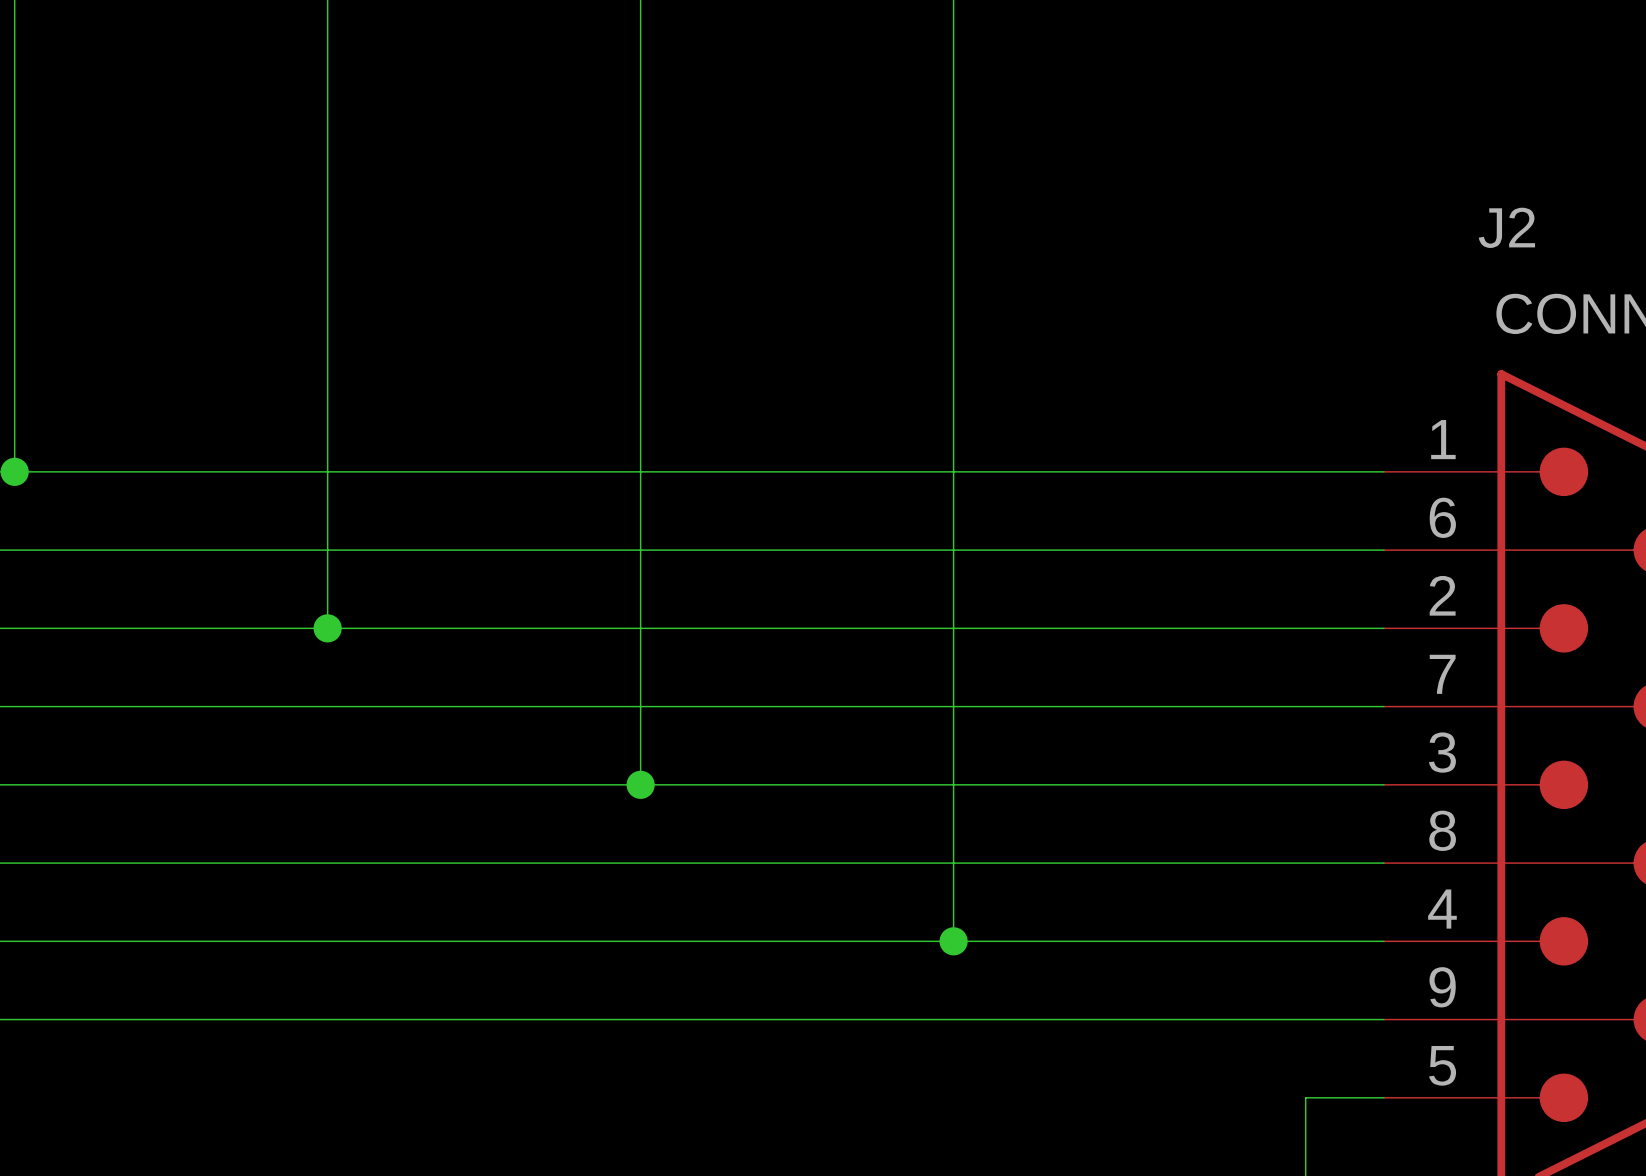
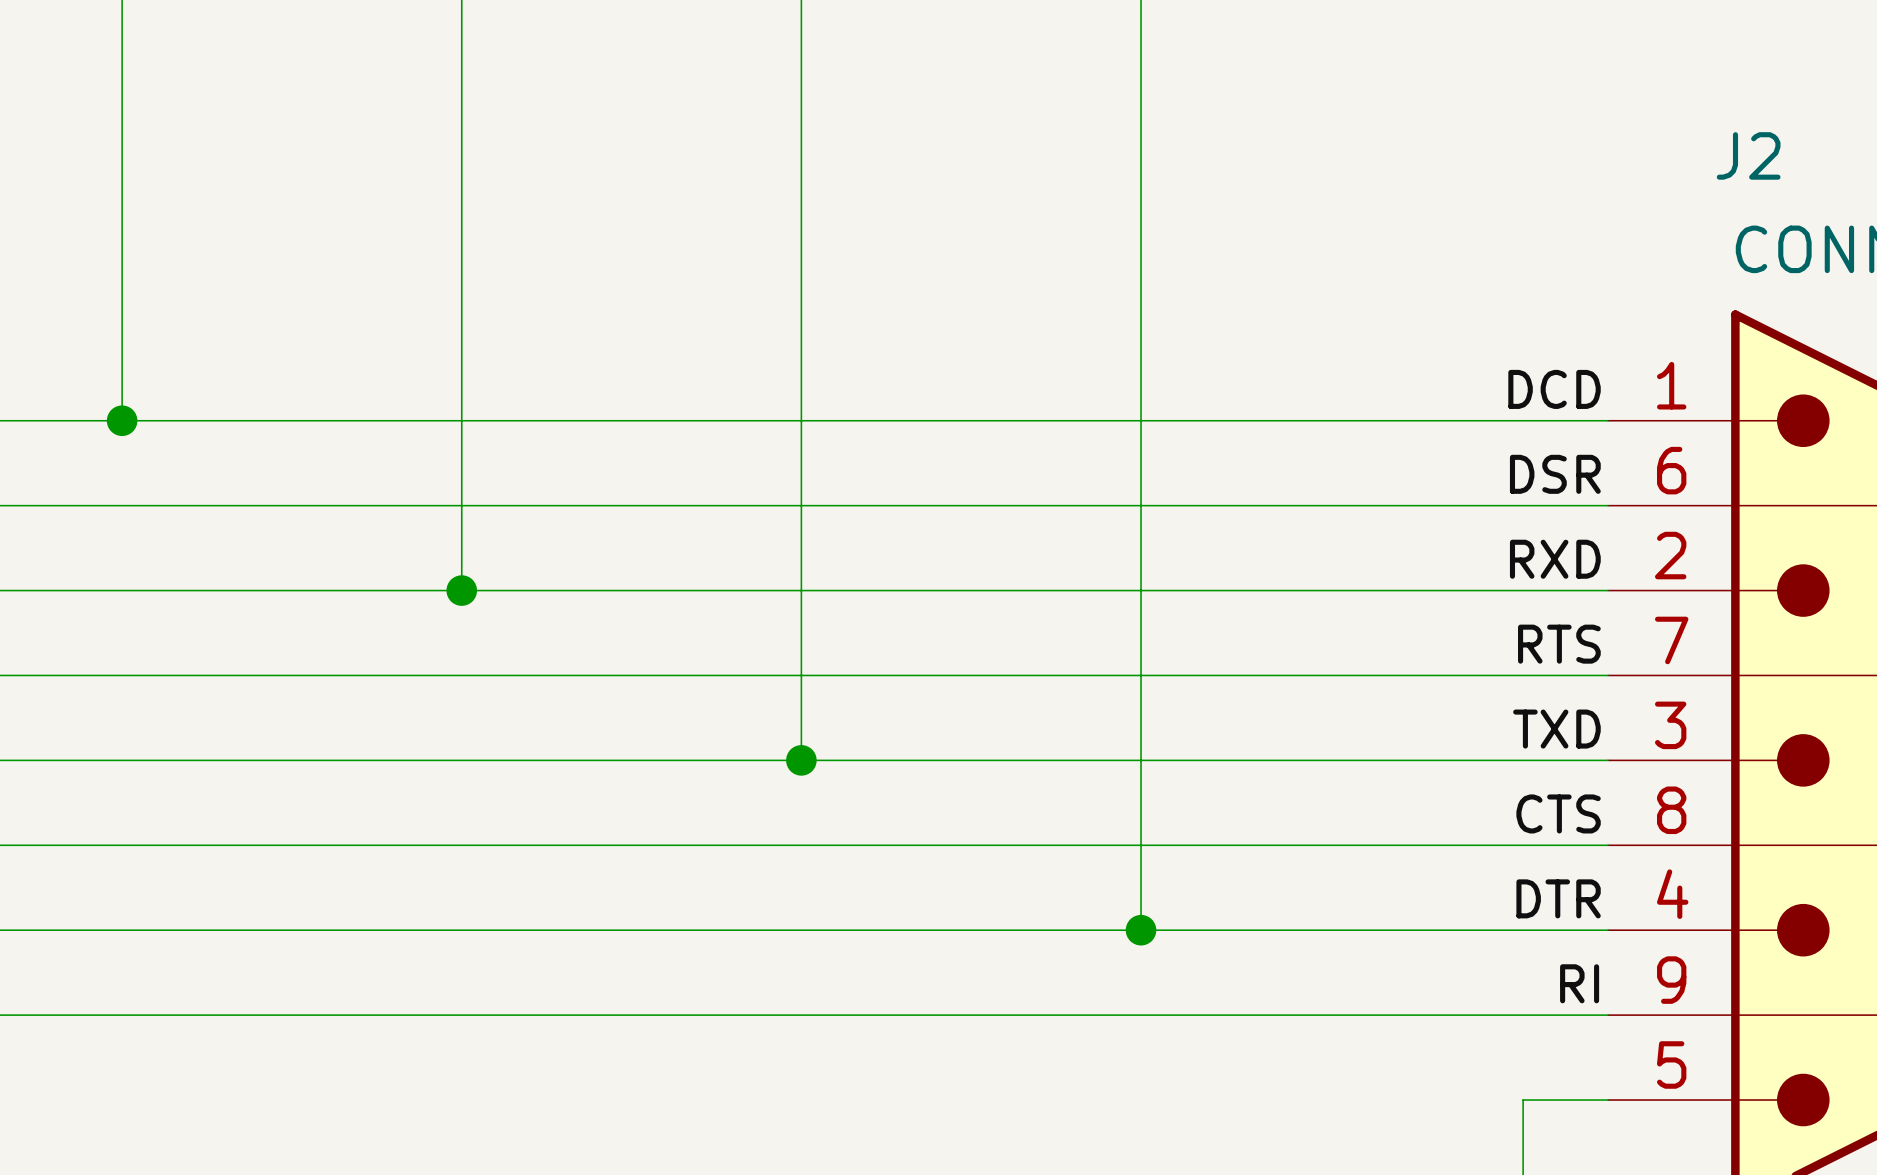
label: none -> DCD (1554, 389)
label: none -> DSR (1555, 474)
label: none -> RXD (1555, 559)
label: none -> RTS (1559, 644)
label: none -> TXD (1556, 729)
label: none -> CTS (1558, 813)
label: none -> DTR (1558, 898)
label: none -> RI (1579, 983)

